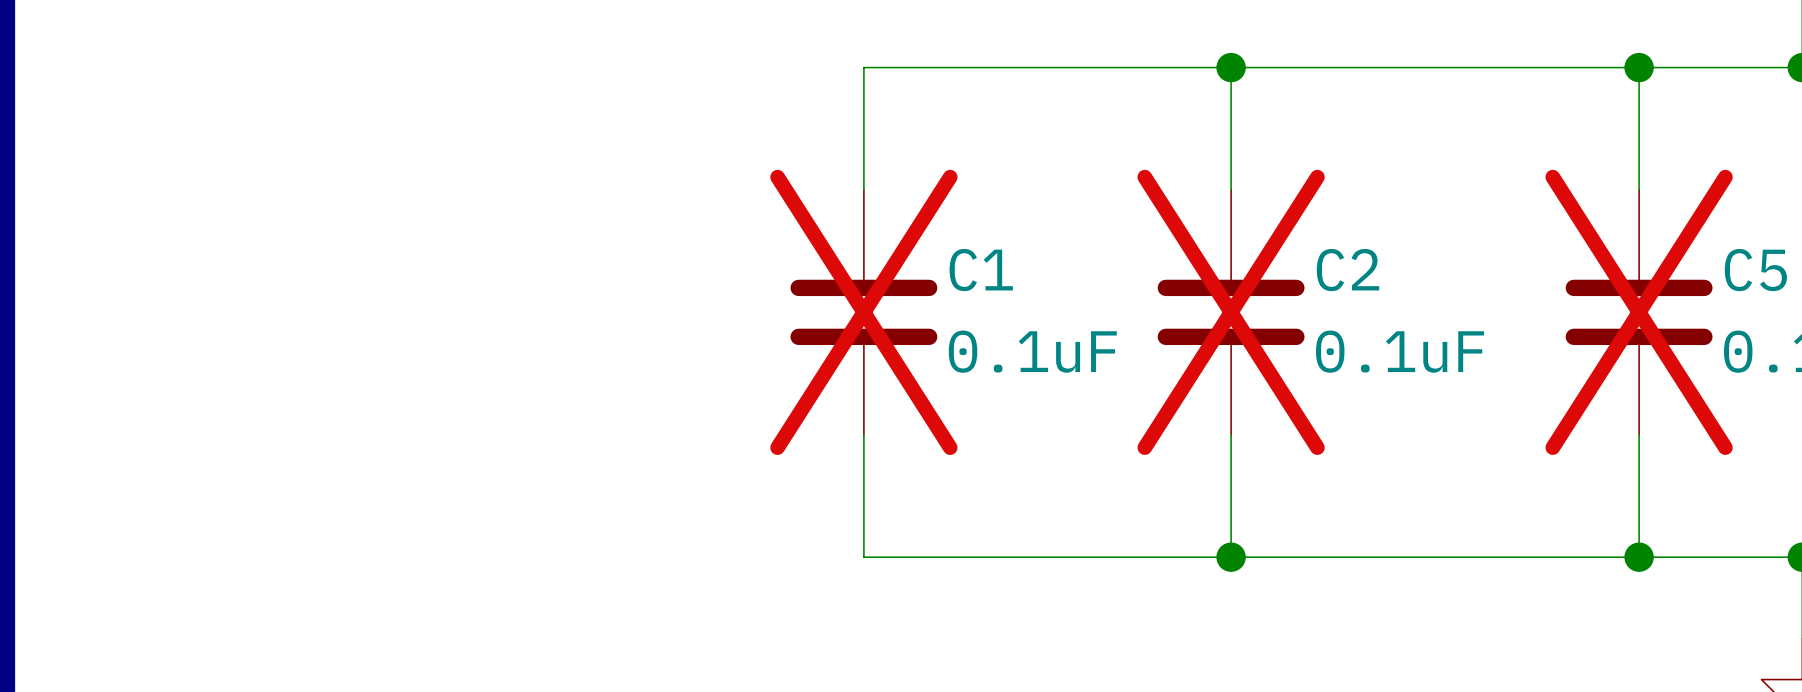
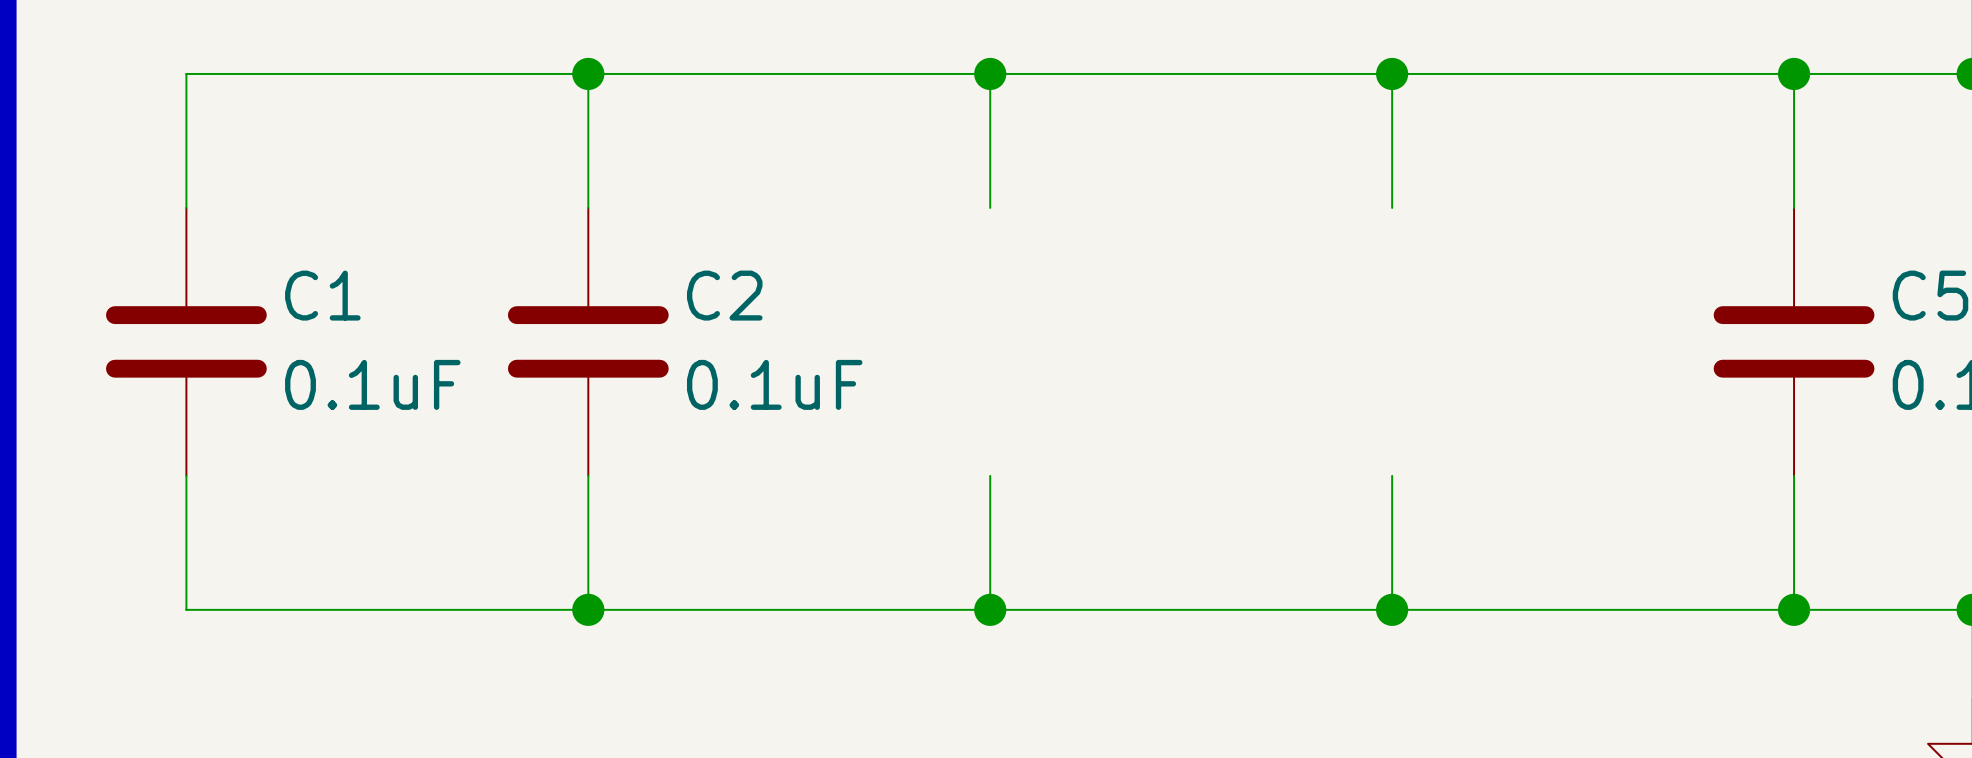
wire: none -> (588, 73) (588, 207)
junction: none -> (588, 73)
wire: (863, 67) (863, 189) -> (945, 73) (186, 73) (186, 207)
wire: none -> (990, 73) (990, 207)
junction: none -> (990, 73)
wire: (1231, 67) (1231, 189) -> (1392, 73) (1392, 207)
junction position: (1231, 67) -> (1392, 73)
C1 position: (863, 312) -> (186, 341)
C1 do-not-place cross: (863, 312) -> none
C2 position: (1231, 312) -> (588, 341)
C2 do-not-place cross: (1231, 312) -> none
C5 do-not-place cross: (1639, 312) -> none
wire: none -> (588, 475) (588, 609)
wire: (863, 434) (863, 557) -> (186, 475) (186, 609) (945, 609)
wire: none -> (990, 475) (990, 609)
wire: (1231, 434) (1231, 557) -> (1392, 475) (1392, 609)
junction: none -> (588, 609)
junction: none -> (990, 609)
junction position: (1231, 557) -> (1392, 609)

